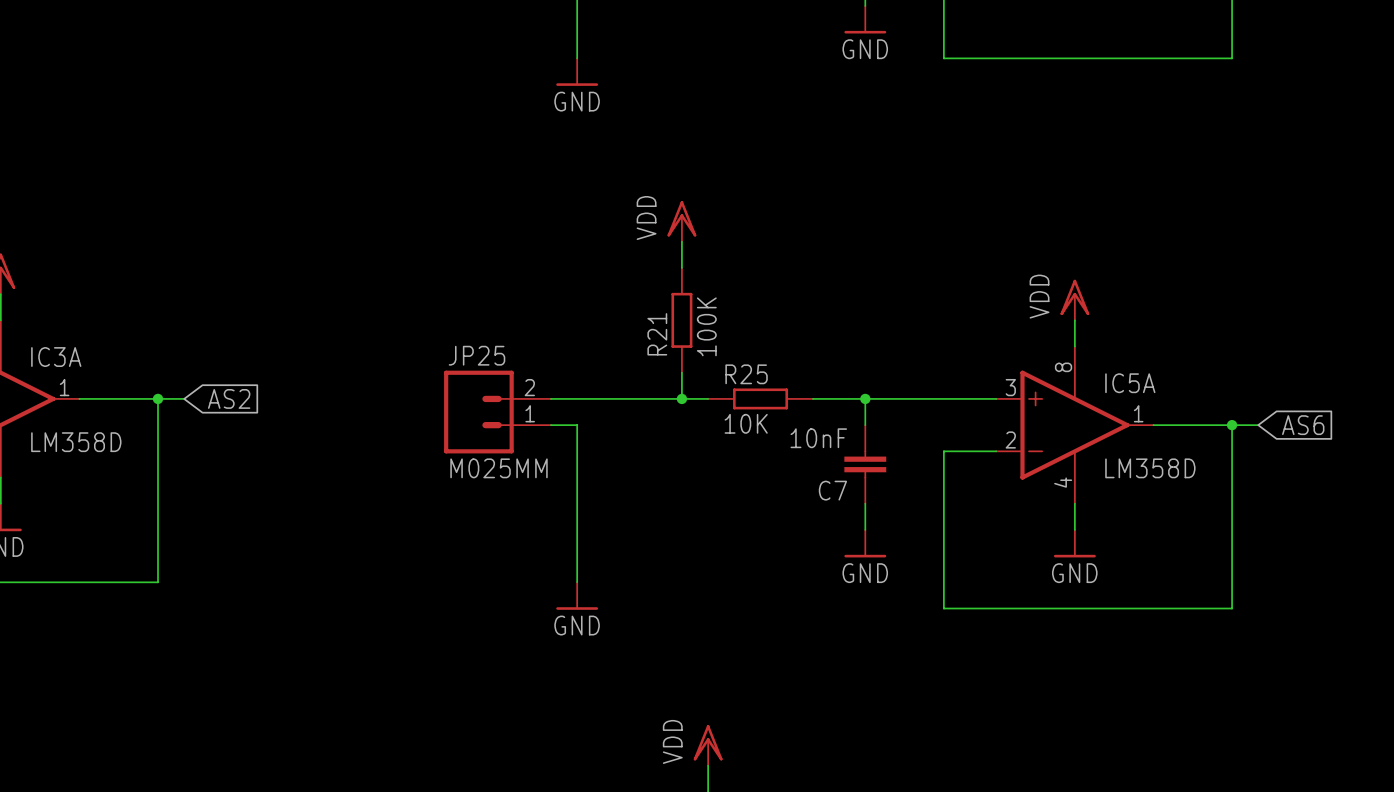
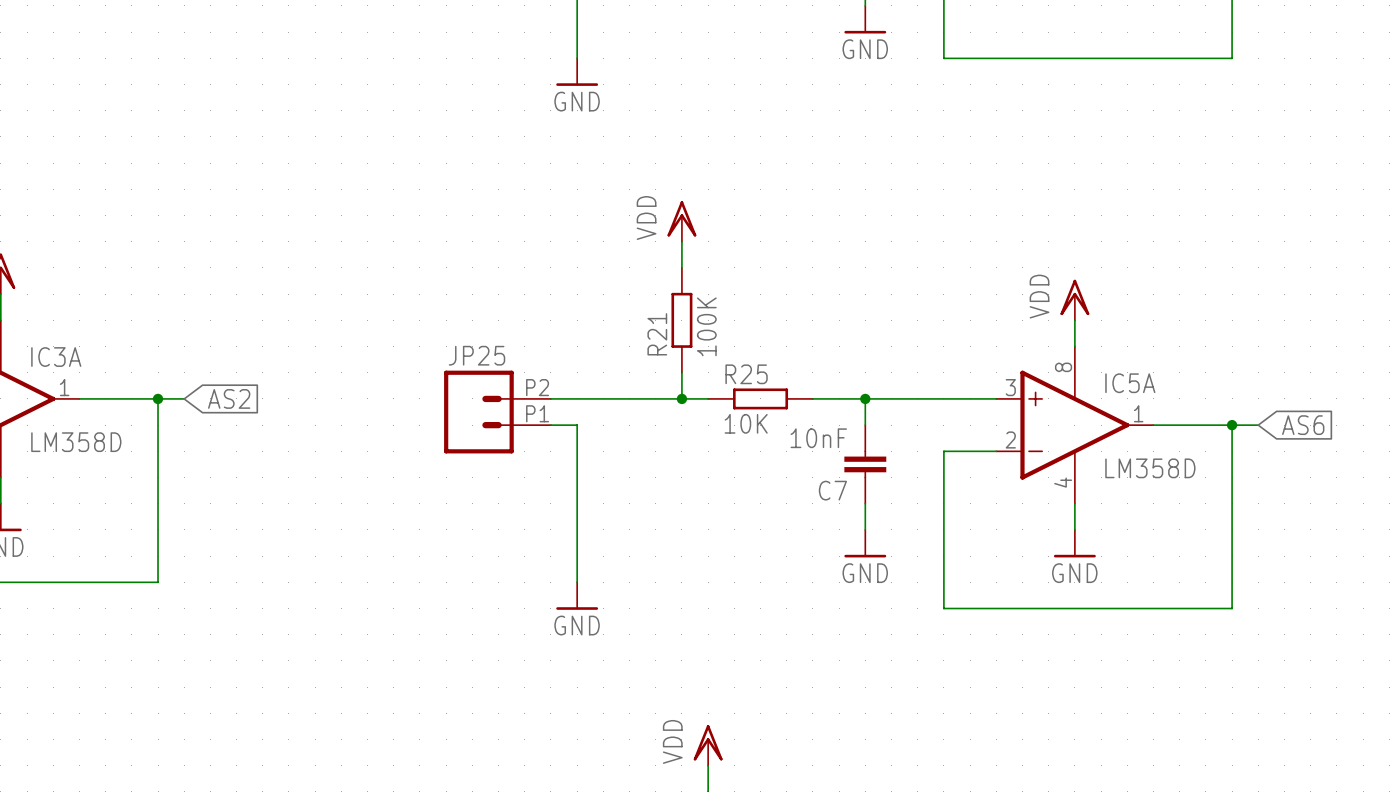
JP25 pin number: 2 (529, 387) -> P2 (537, 387)
JP25 pin number: 1 (530, 413) -> P1 (537, 413)
JP25 value: M025MM (499, 468) -> none

